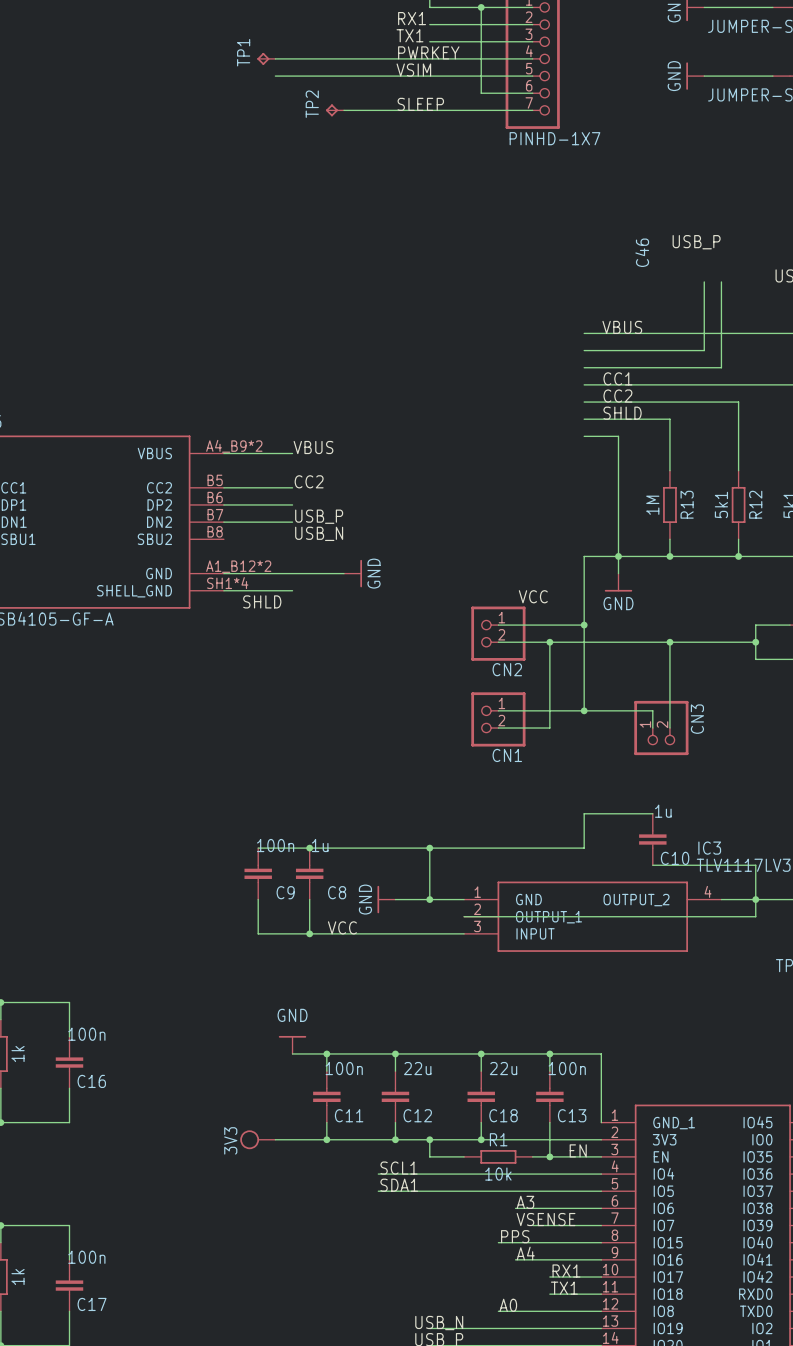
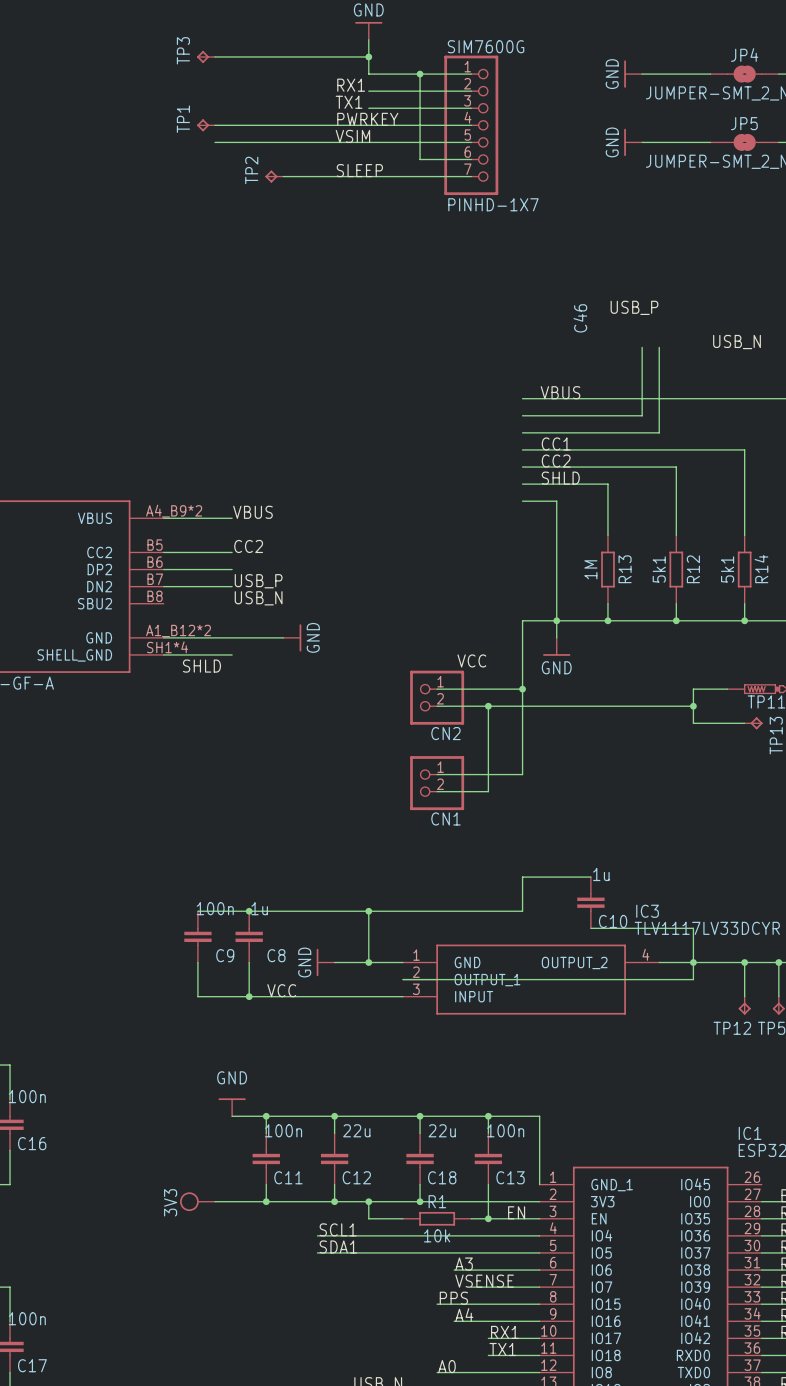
wire: (669, 642) (669, 728) -> none
junction: (669, 642) -> none
wire: (584, 710) (652, 710) (652, 728) -> none
junction: (584, 710) -> none
CN3: (661, 728) -> none

